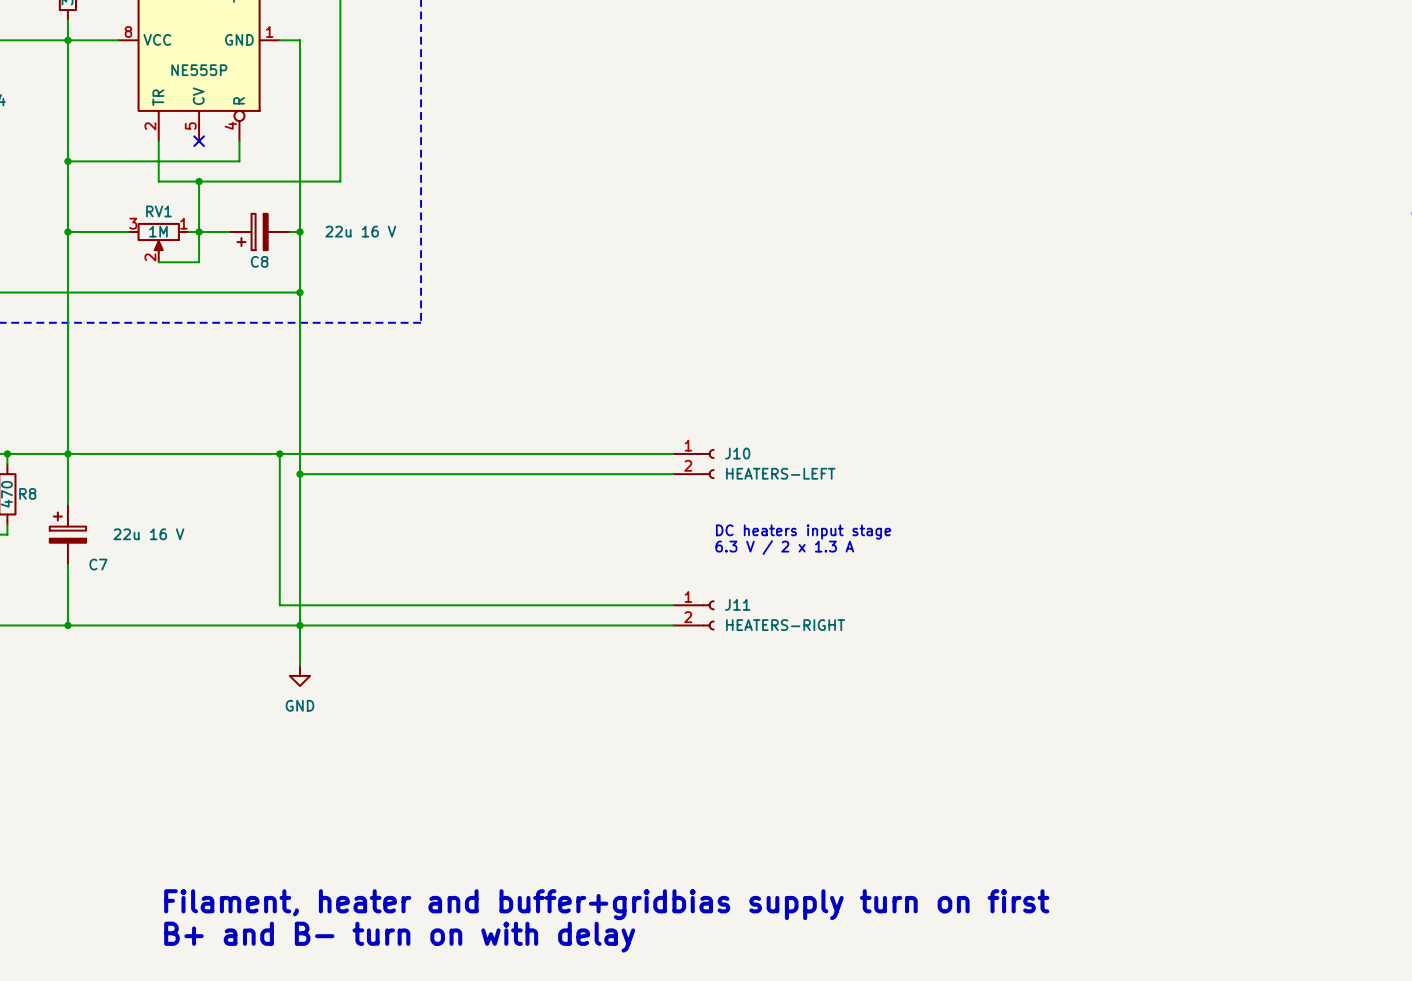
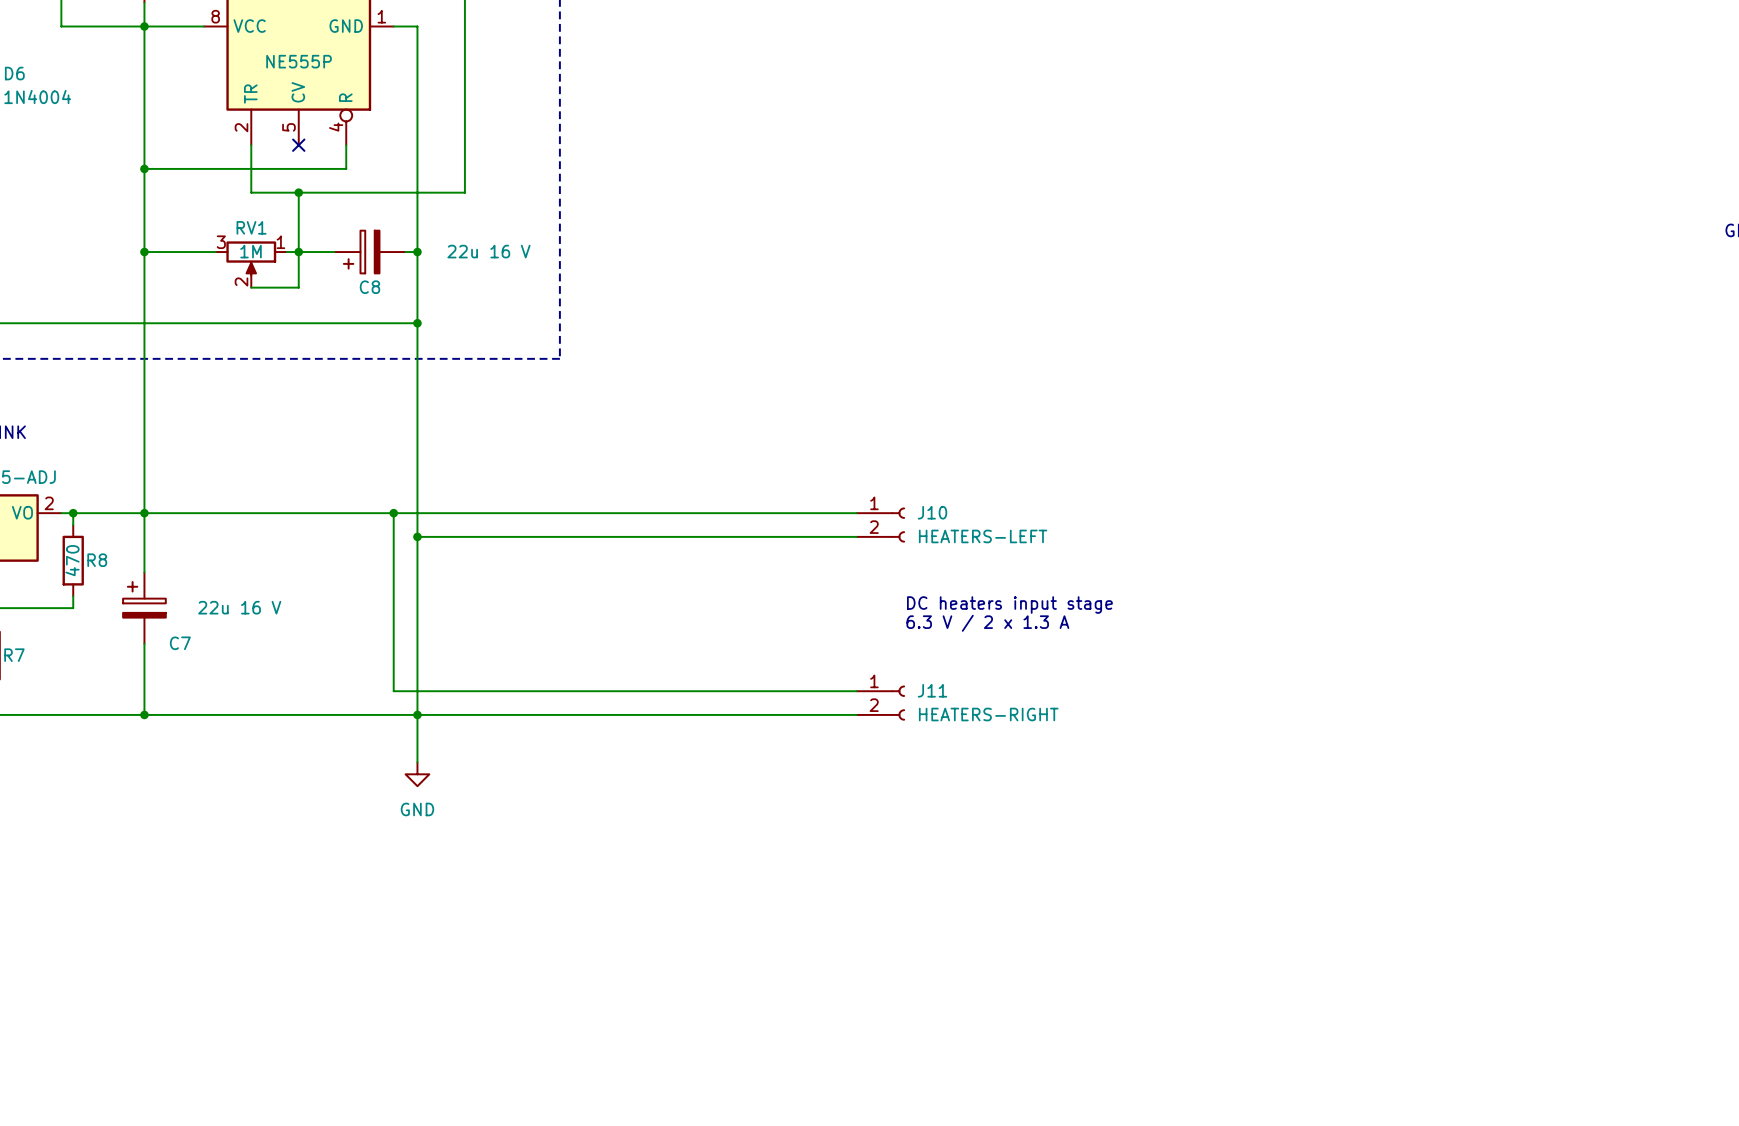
text: Filament, heater and buffer+gridbias supply turn on first (606, 904) -> none
text: B+ and B- turn on with delay (399, 937) -> none

